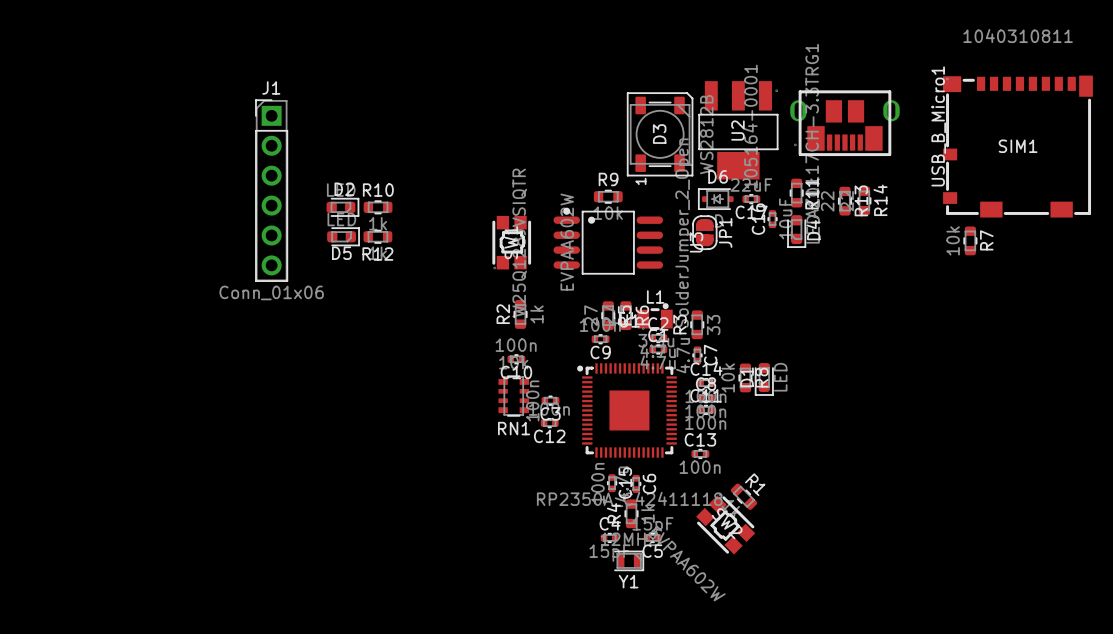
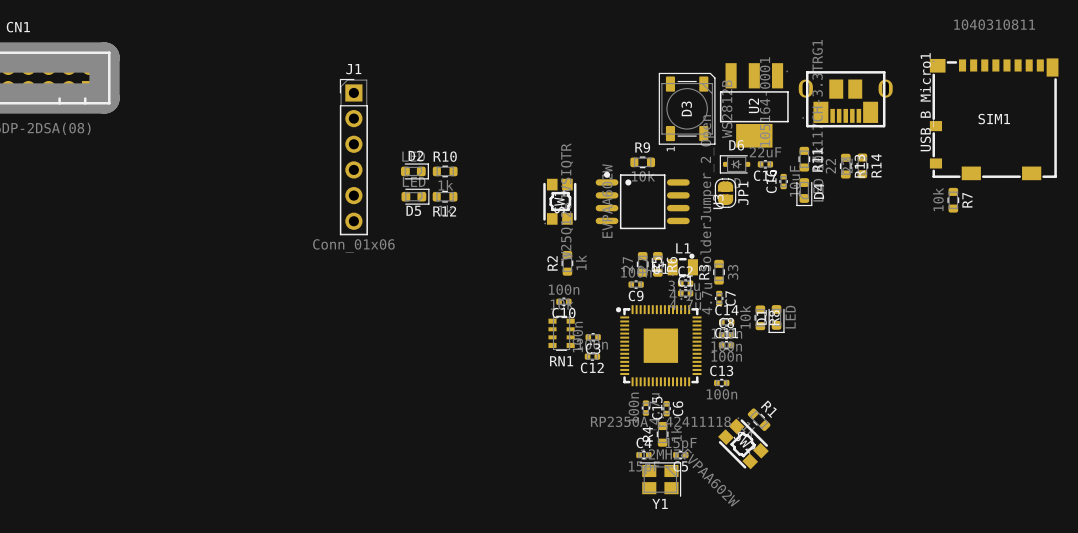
Y1 footprint: [614, 550, 644, 572] -> [639, 462, 682, 497]

